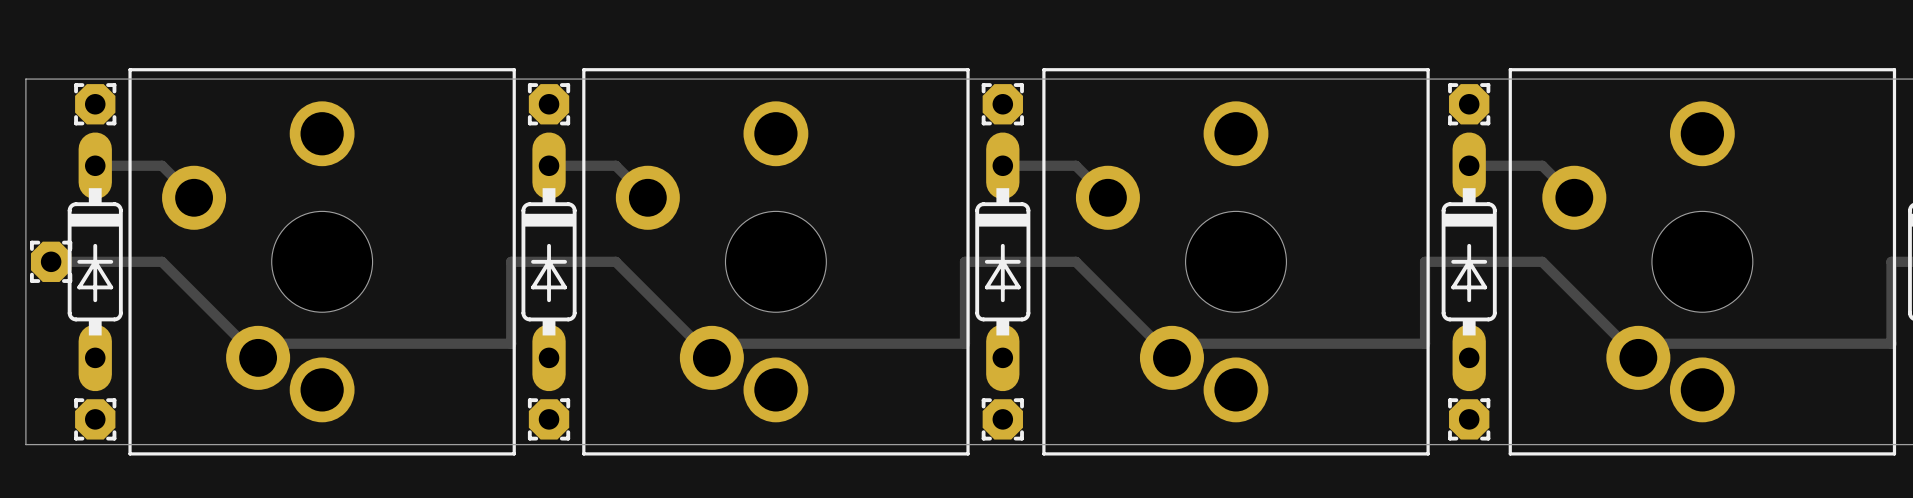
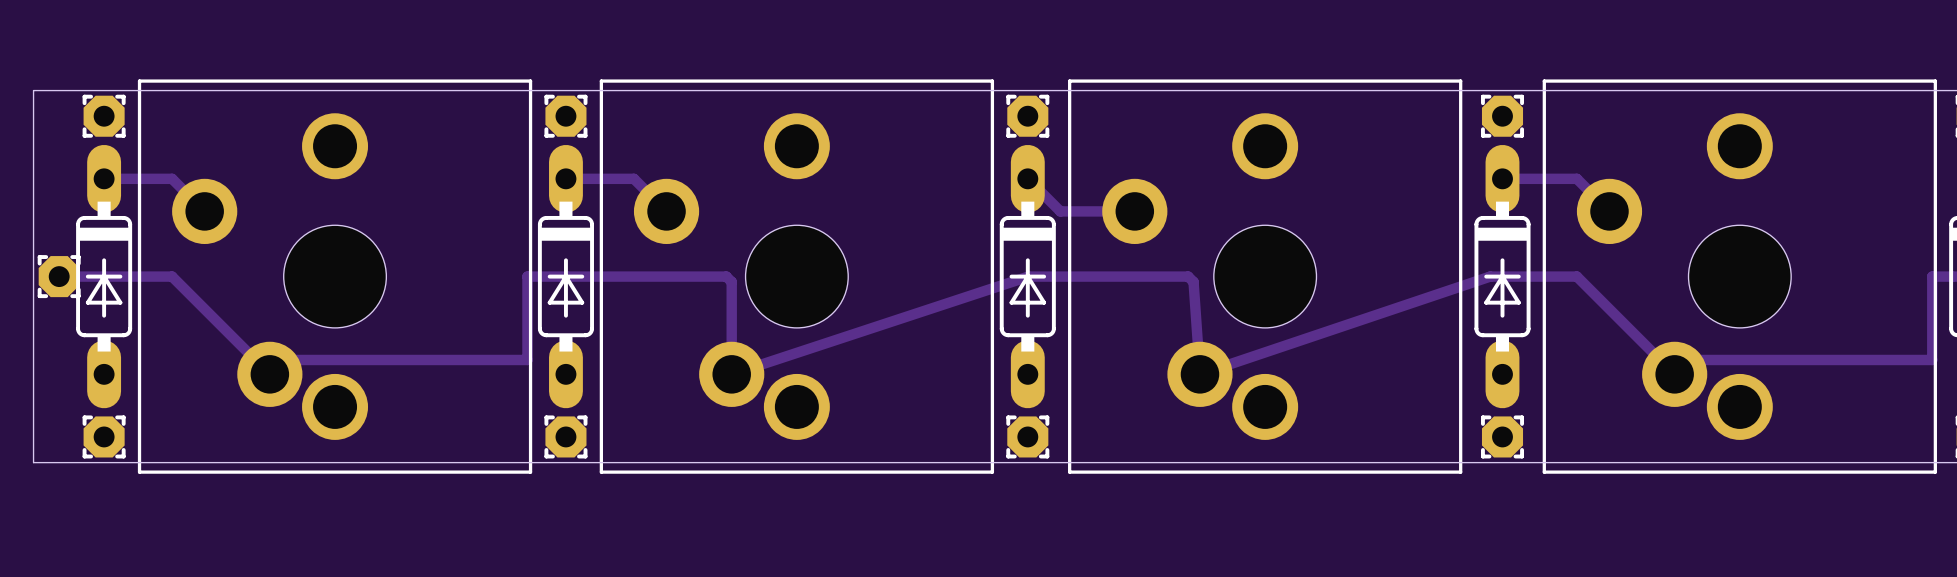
track: (1002, 165) (1075, 165) (1107, 197) -> (1027, 178) (1060, 211) (1134, 211)
track: (615, 261) (711, 357) (726, 343) (964, 343) (964, 261) (1003, 261) -> (633, 276) (726, 276) (731, 281) (731, 374) (1028, 276)
track: (1075, 261) (1171, 357) (1186, 343) (1425, 343) (1425, 261) (1457, 261) -> (1102, 276) (1188, 276) (1193, 281) (1199, 374) (1490, 276)

